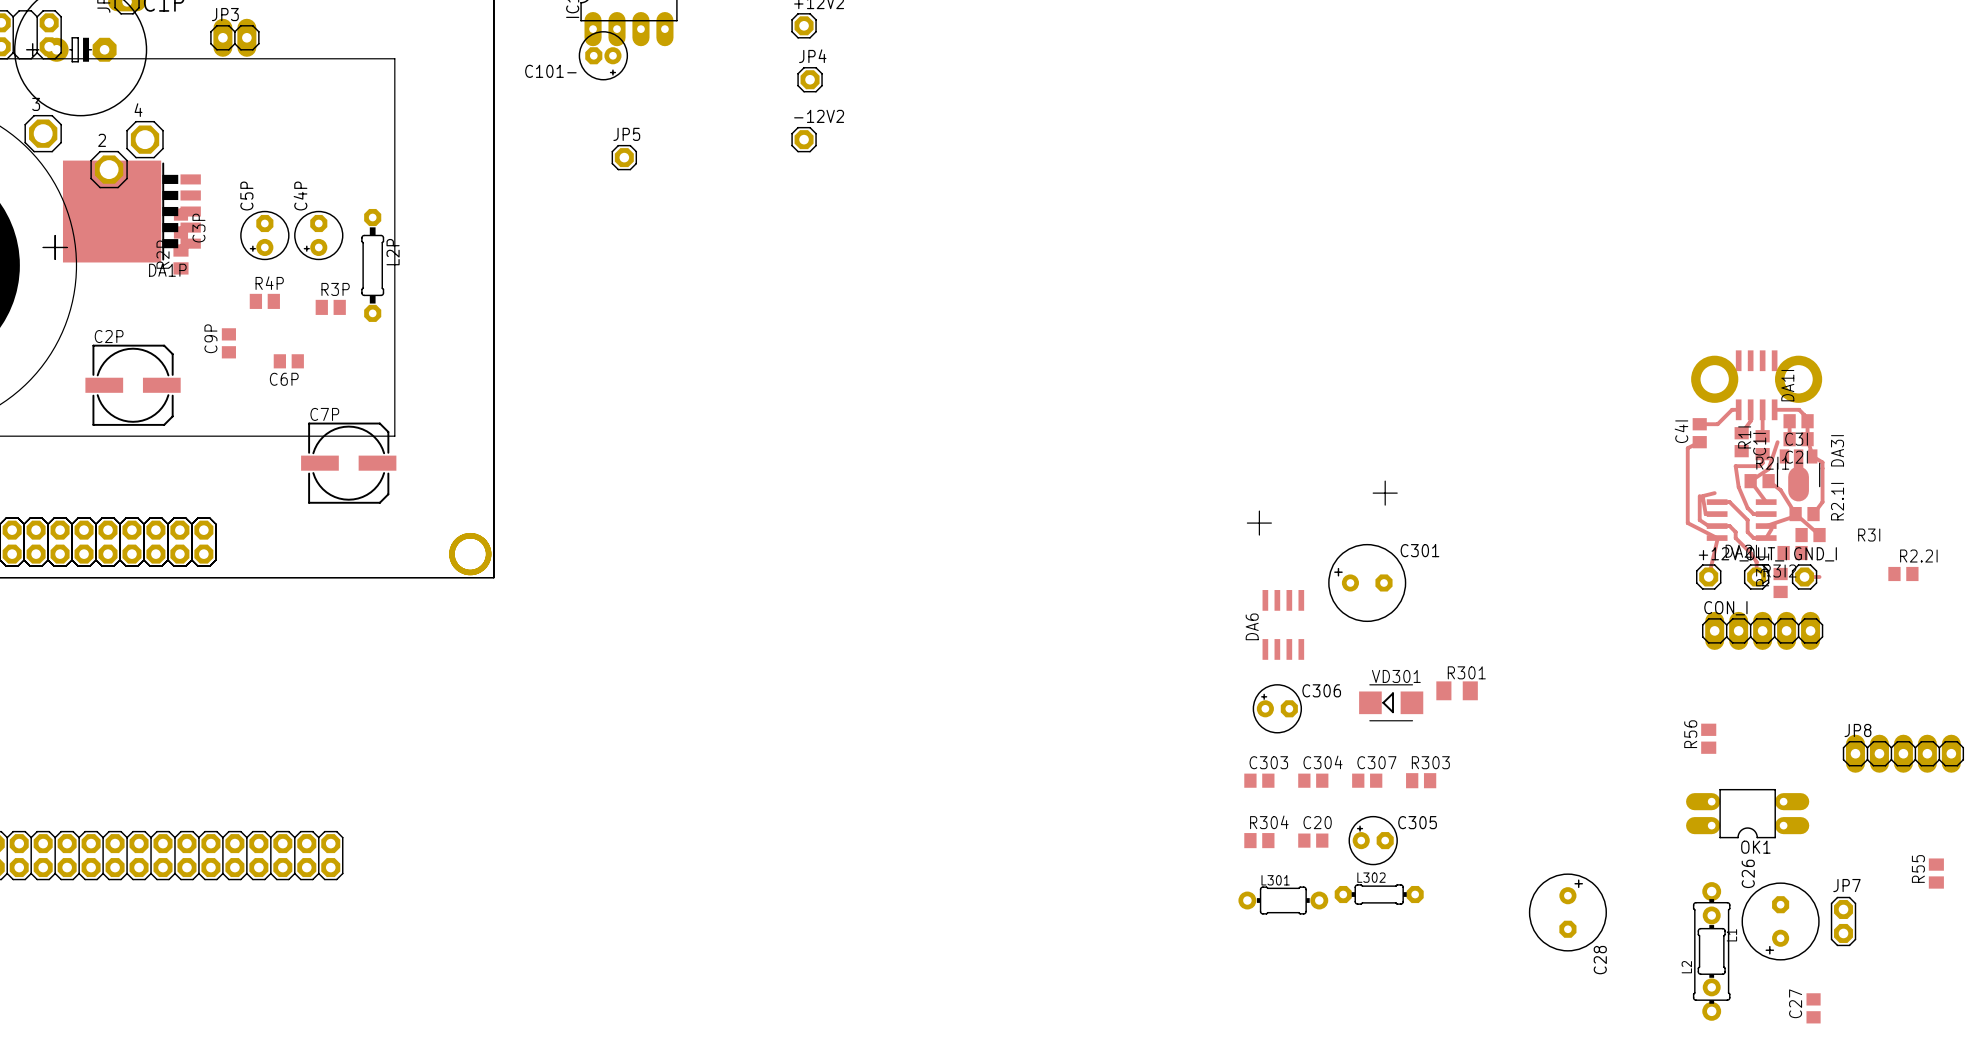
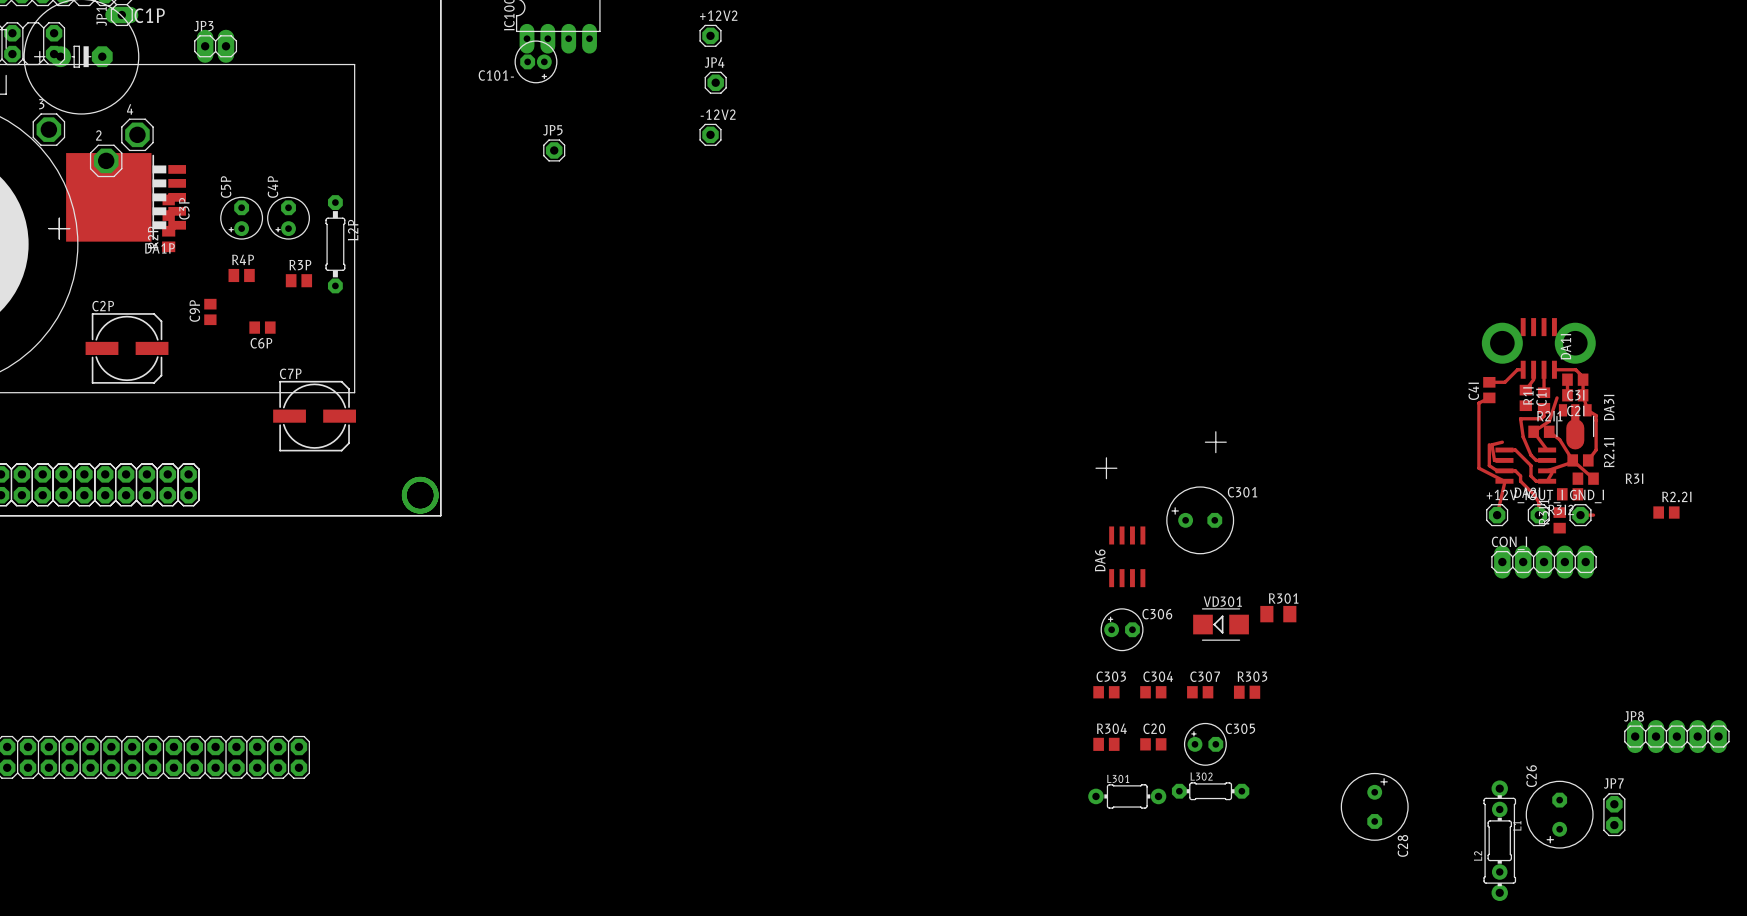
R56: (1708, 738) -> none
JP8 position: (1903, 753) -> (1676, 736)
OK1: (1747, 813) -> none
R55: (1936, 873) -> none
C27: (1813, 1008) -> none

